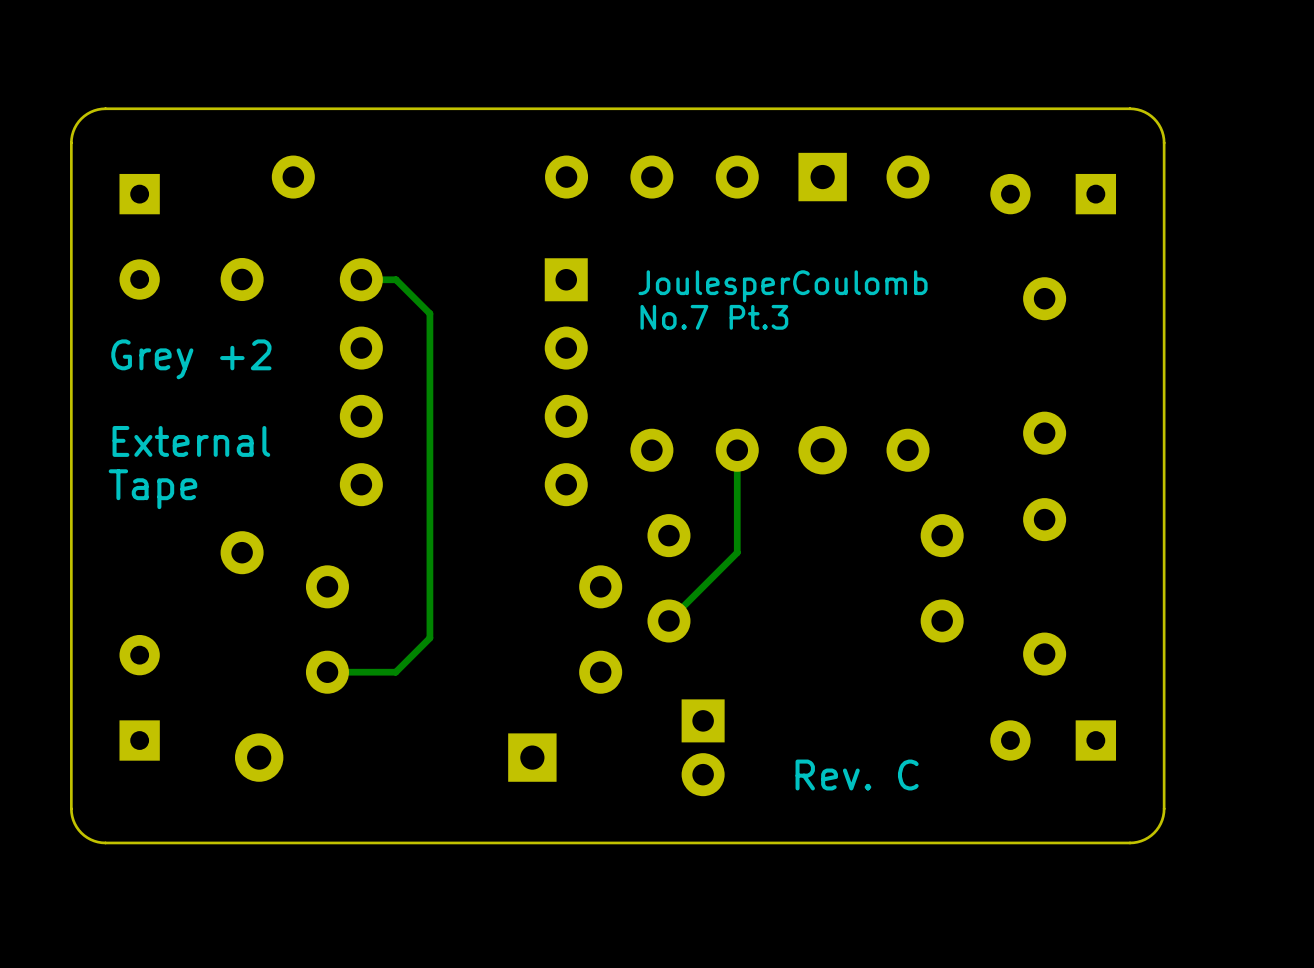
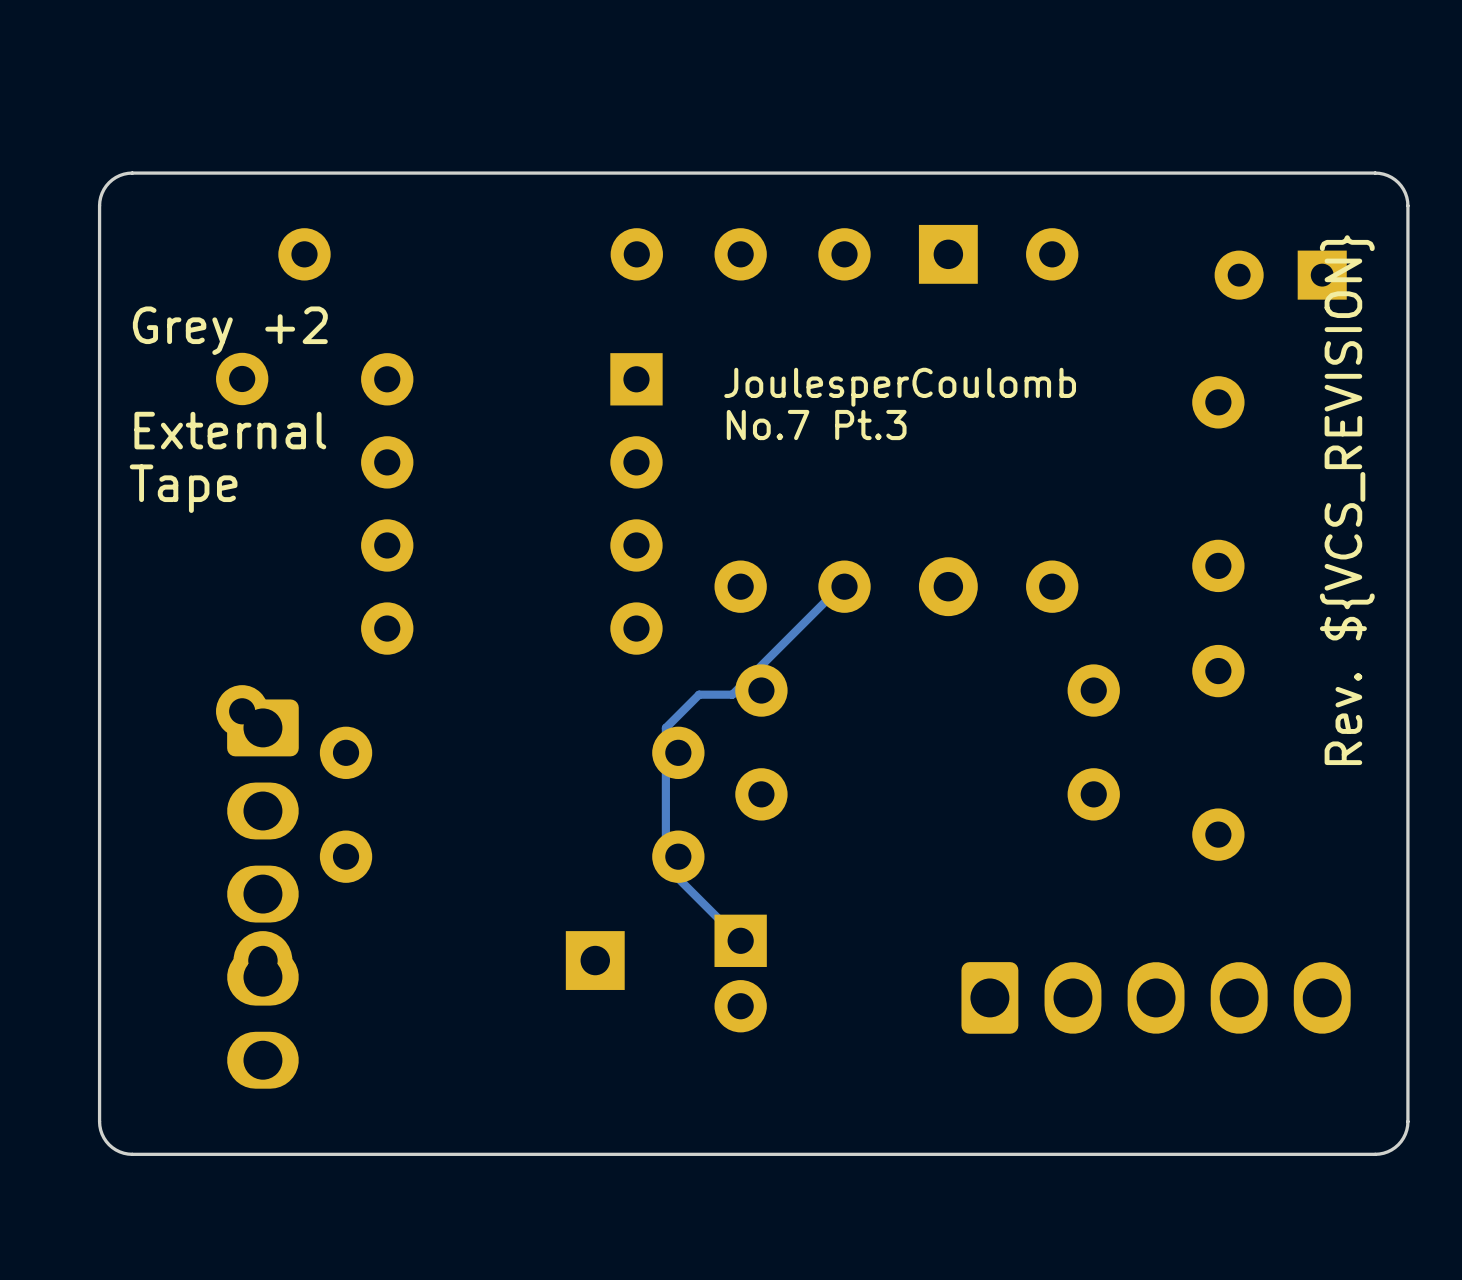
board edge: (105, 108) (1129, 108) (1148, 113) (1158, 124) (1164, 142) (1164, 808) (1158, 826) (1144, 839) (1129, 842) (105, 842) (87, 837) (76, 826) (71, 808) (71, 142) (74, 128) (81, 118) (90, 112) (105, 108) -> (1375, 173) (1387, 175) (1398, 182) (1405, 193) (1407, 205) (1407, 1121) (1403, 1137) (1395, 1147) (1387, 1151) (1375, 1154) (132, 1154) (115, 1149) (106, 1141) (100, 1130) (99, 1121) (99, 205) (103, 189) (112, 179) (119, 175) (132, 173) (1375, 173)
part: (139, 194) -> none
part position: (1010, 194) -> (1239, 275)
part position: (1095, 194) -> (1322, 275)
part: (139, 279) -> none
track: (361, 279) (396, 279) (429, 313) (429, 638) (395, 672) (327, 672) -> none
text position: Grey +2 (191, 359) -> Grey +2 (230, 330)
text: none -> Rev. ${VCS_REVISION} (1347, 500)
text position: External (191, 441) -> External (230, 430)
track: (737, 450) (737, 552) (668, 620) -> (844, 586) (840, 586) (732, 694) (699, 694) (665, 727) (665, 866) (740, 940)
text position: Tape (152, 489) -> Tape (183, 488)
part: (139, 655) -> none
part: none -> (262, 894)
part: (139, 740) -> none
part: (1010, 740) -> none
part: (1095, 740) -> none
part position: (703, 747) -> (740, 973)
text: Rev. C (857, 775) -> none
part: none -> (1156, 997)

